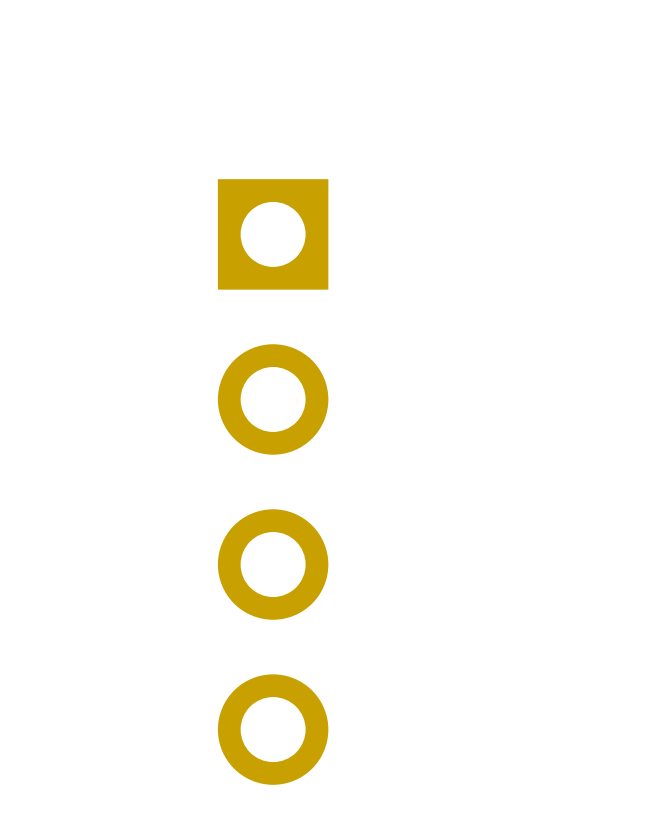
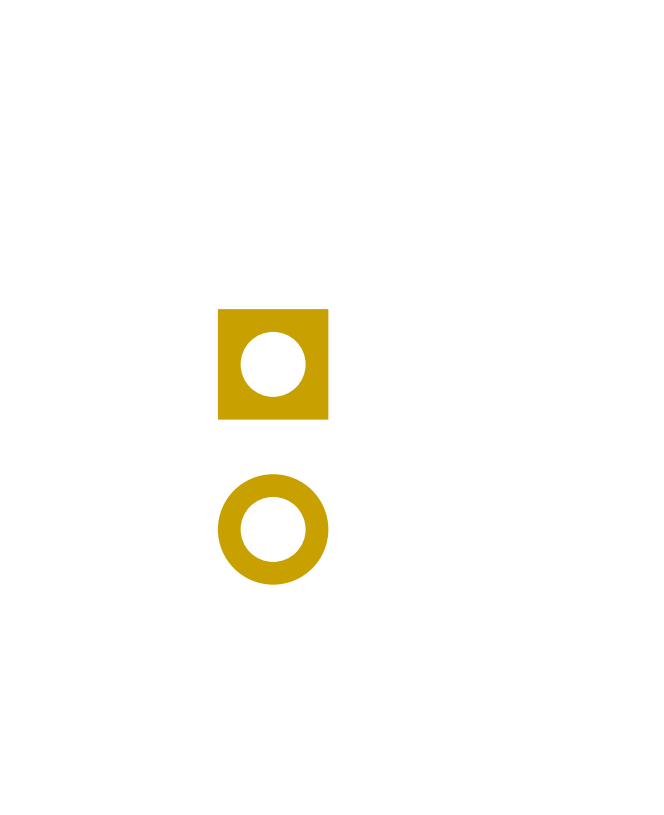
part footprint: [217, 179, 329, 785] -> [217, 309, 329, 585]

